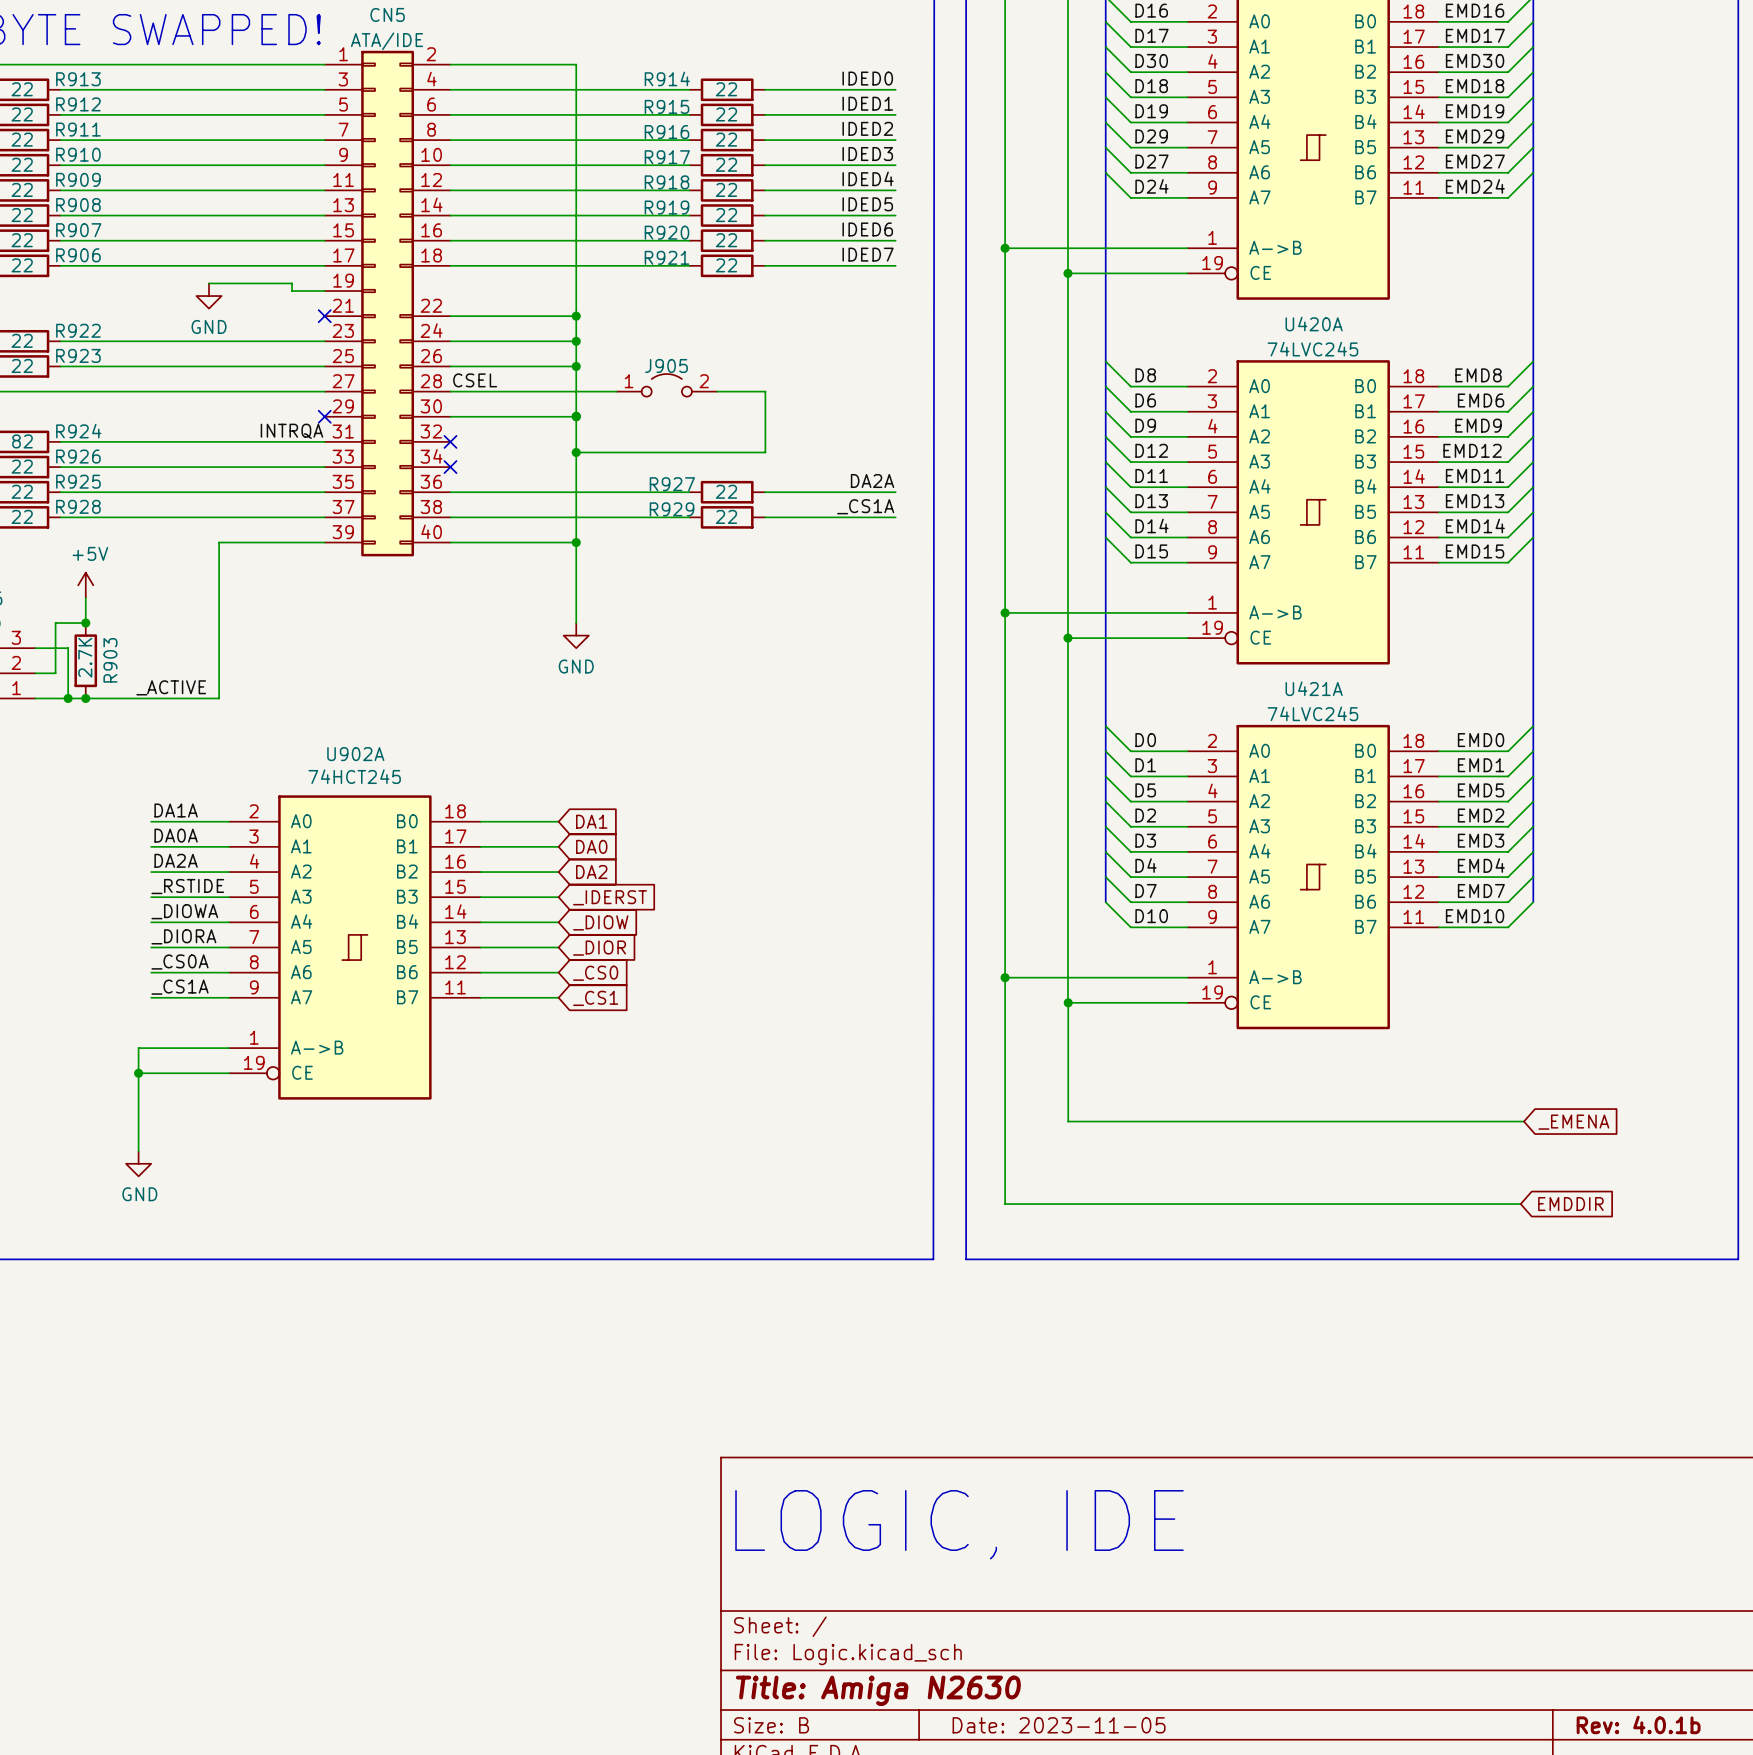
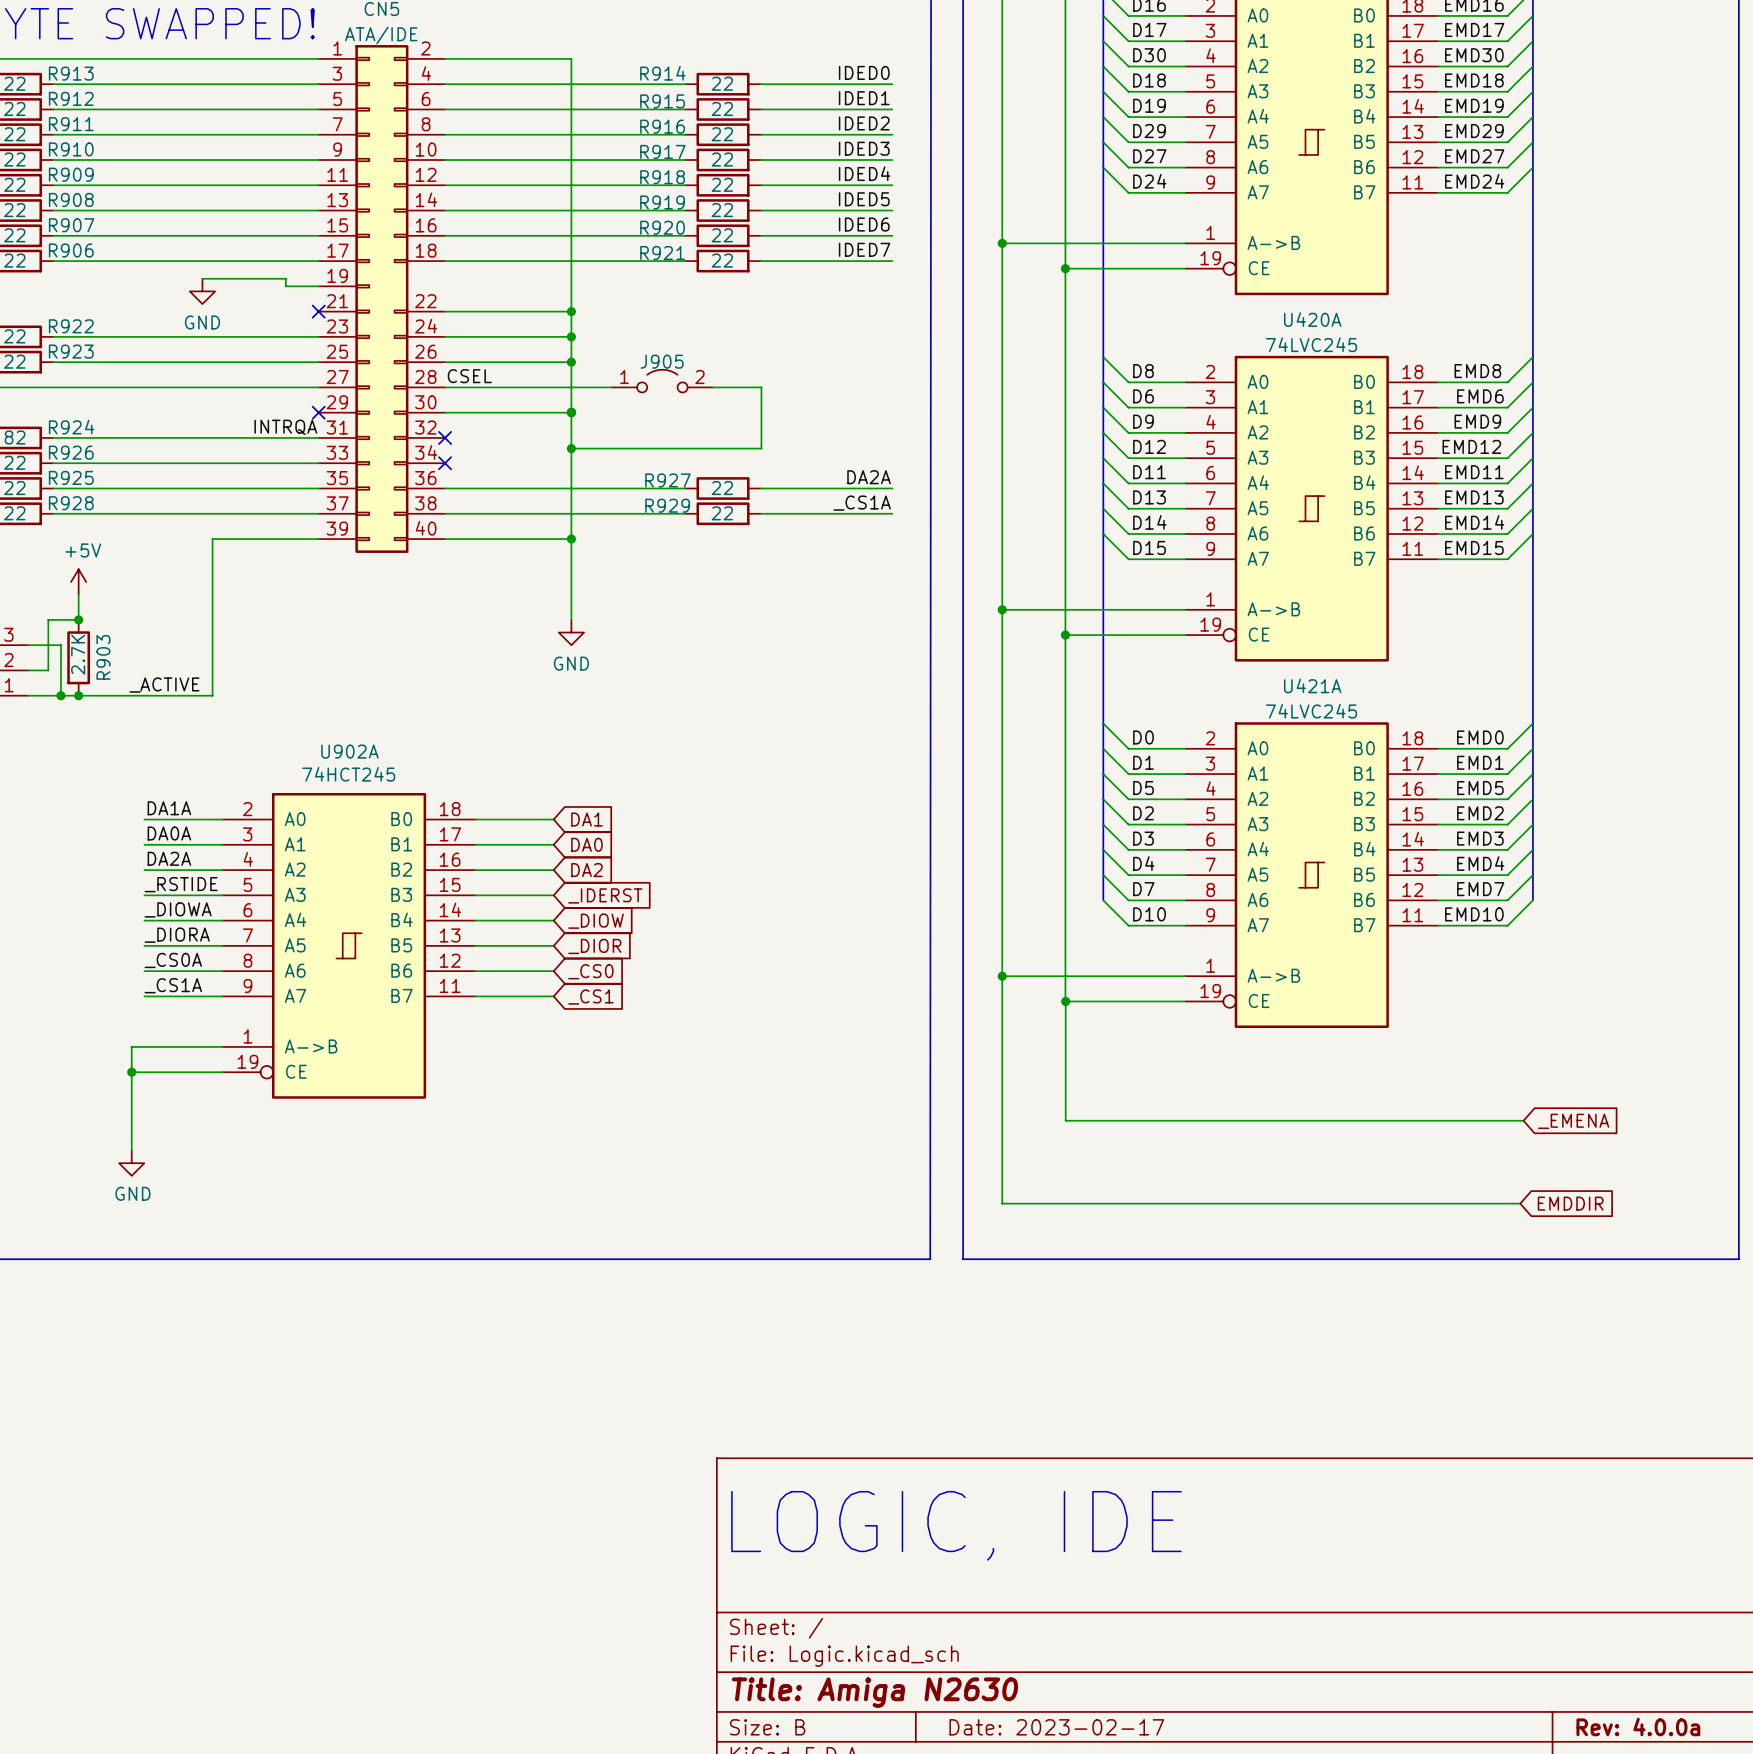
title block: Rev: 4.0.1b (1638, 1724) -> Rev: 4.0.0a (1638, 1726)
title block: Date: 2023-11-05 (1059, 1725) -> Date: 2023-02-17 (1056, 1727)

